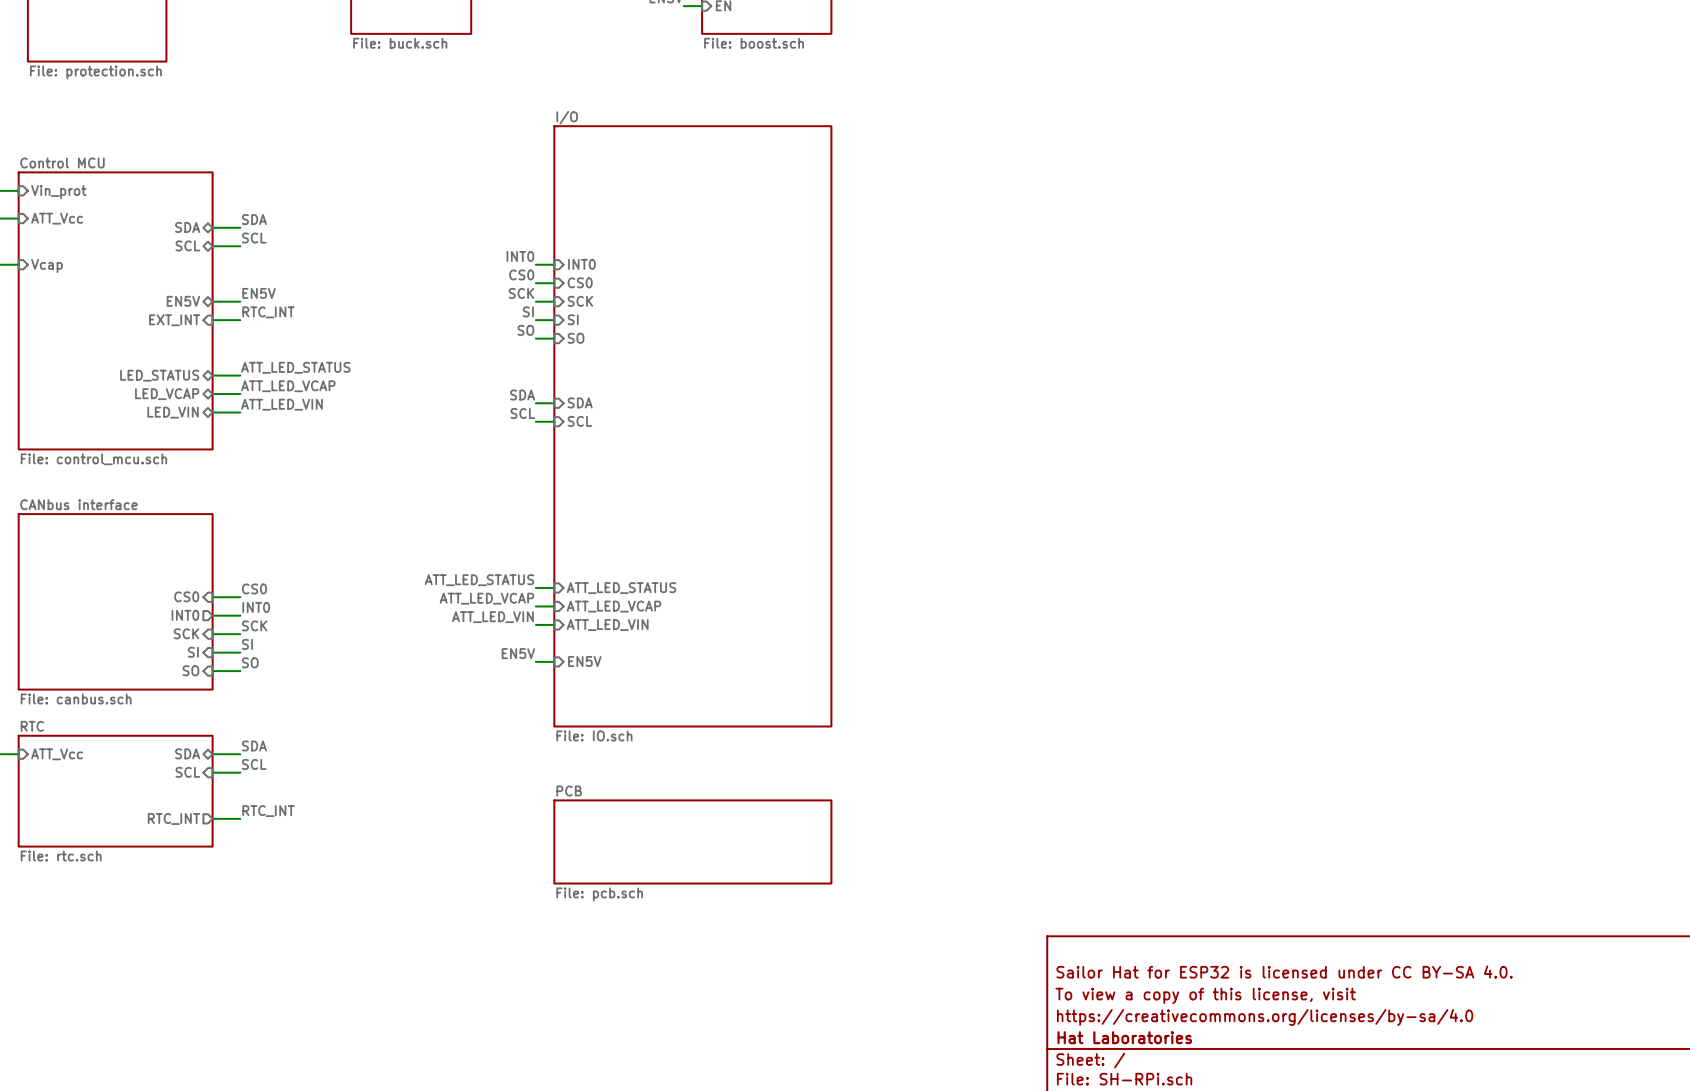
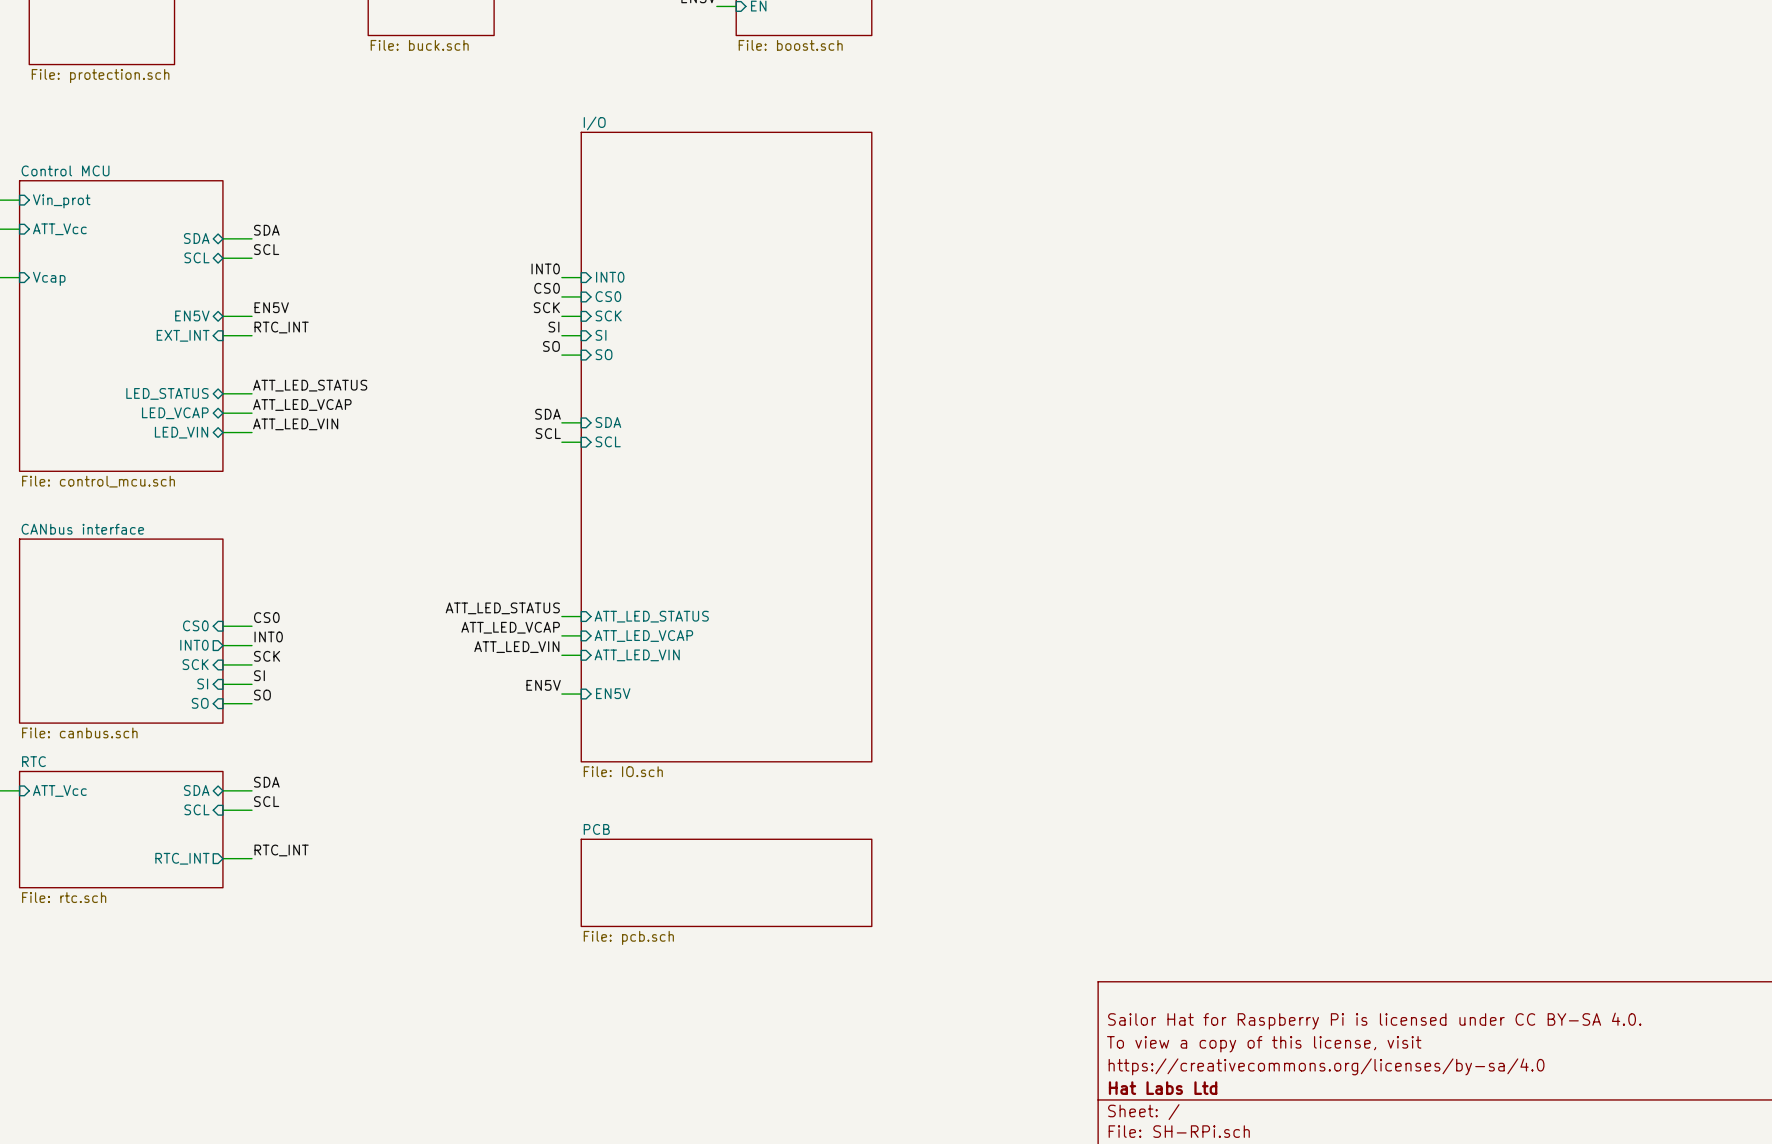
title block: Sailor Hat for ESP32 is licensed under CC BY-SA 4.0. (1284, 971) -> Sailor Hat for Raspberry Pi is licensed under CC BY-SA 4.0. (1374, 1021)
title block: Hat Laboratories (1124, 1037) -> Hat Labs Ltd (1163, 1088)

